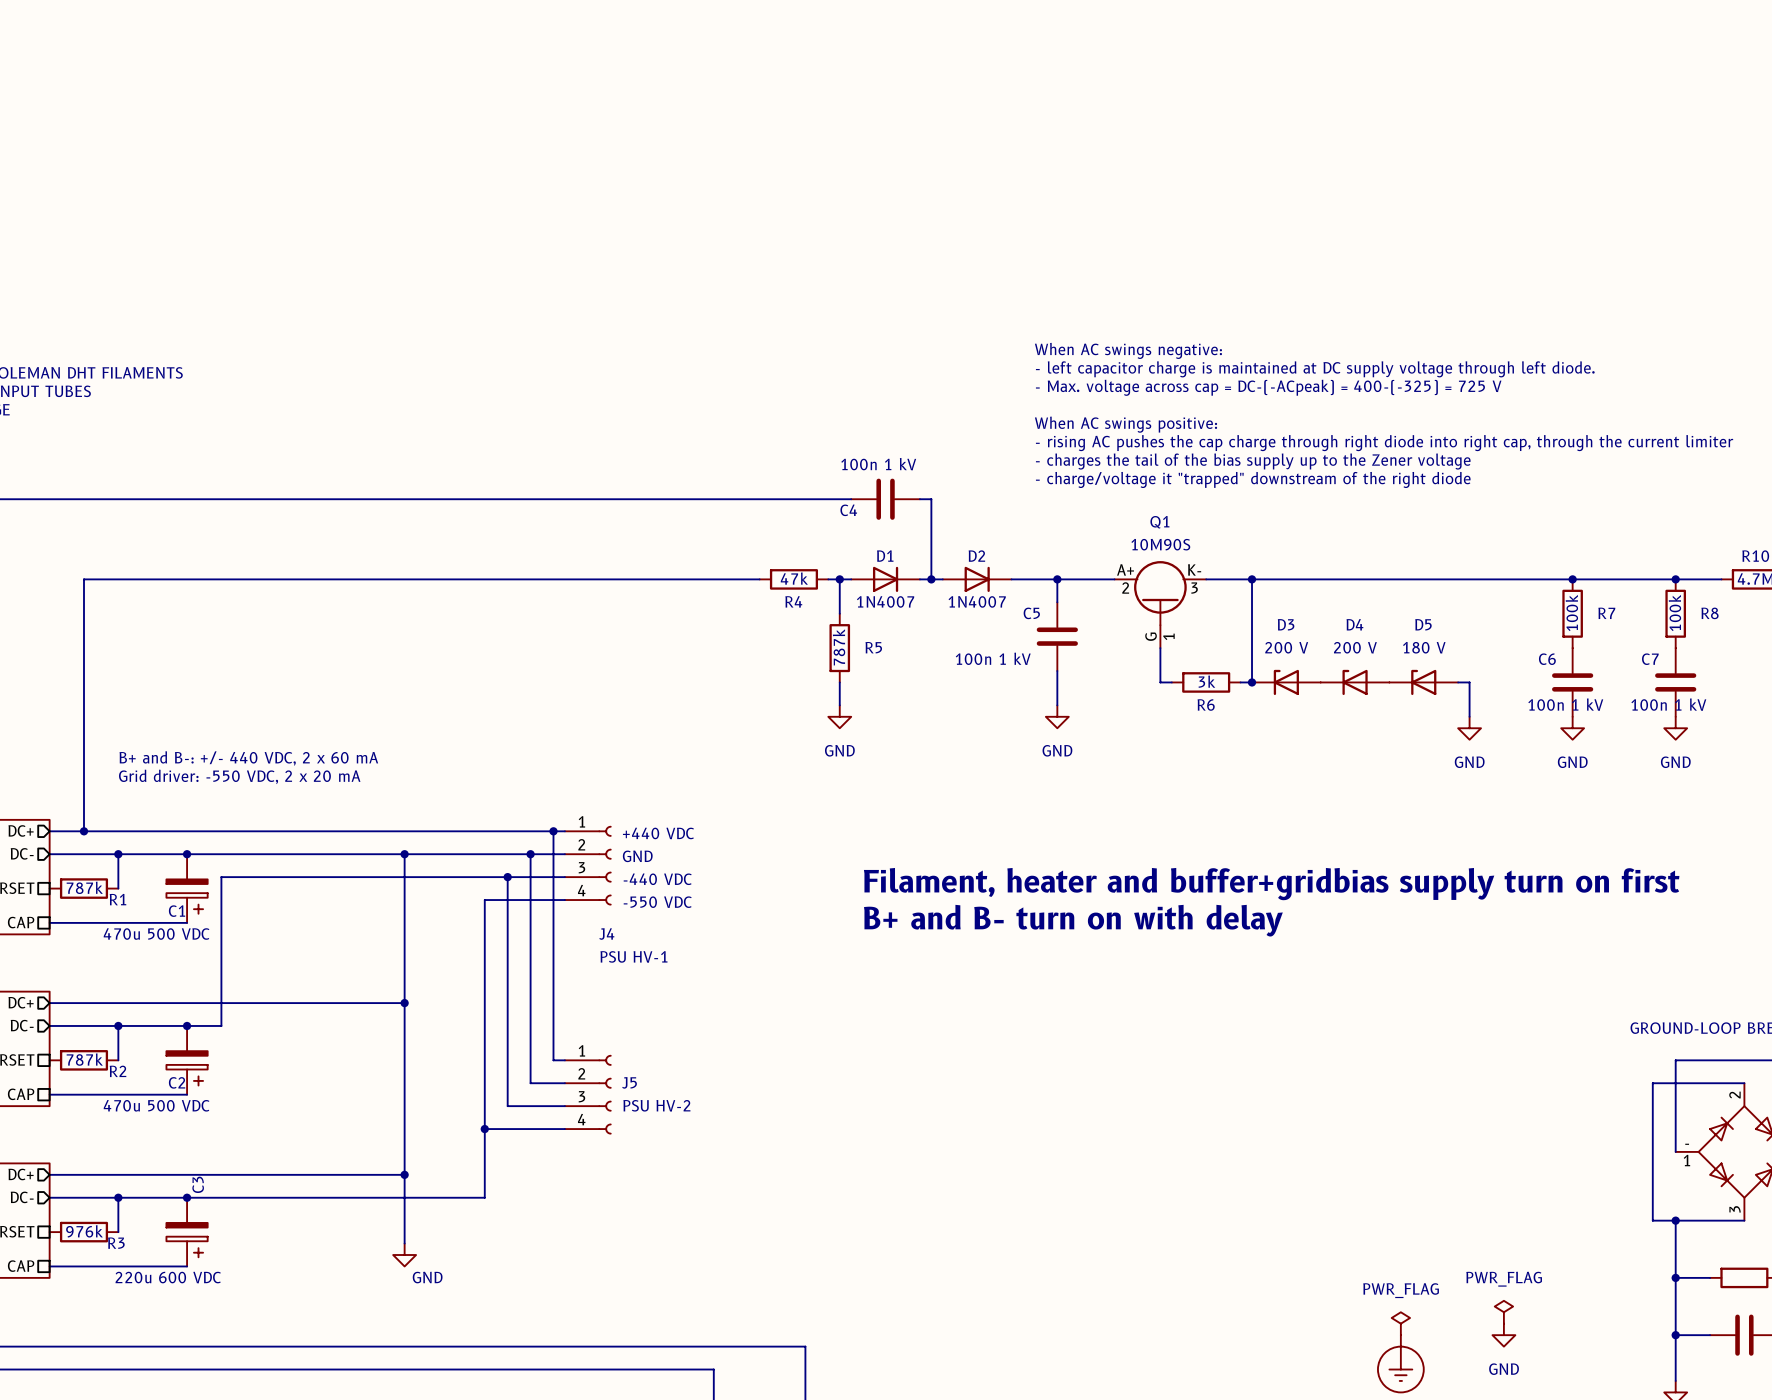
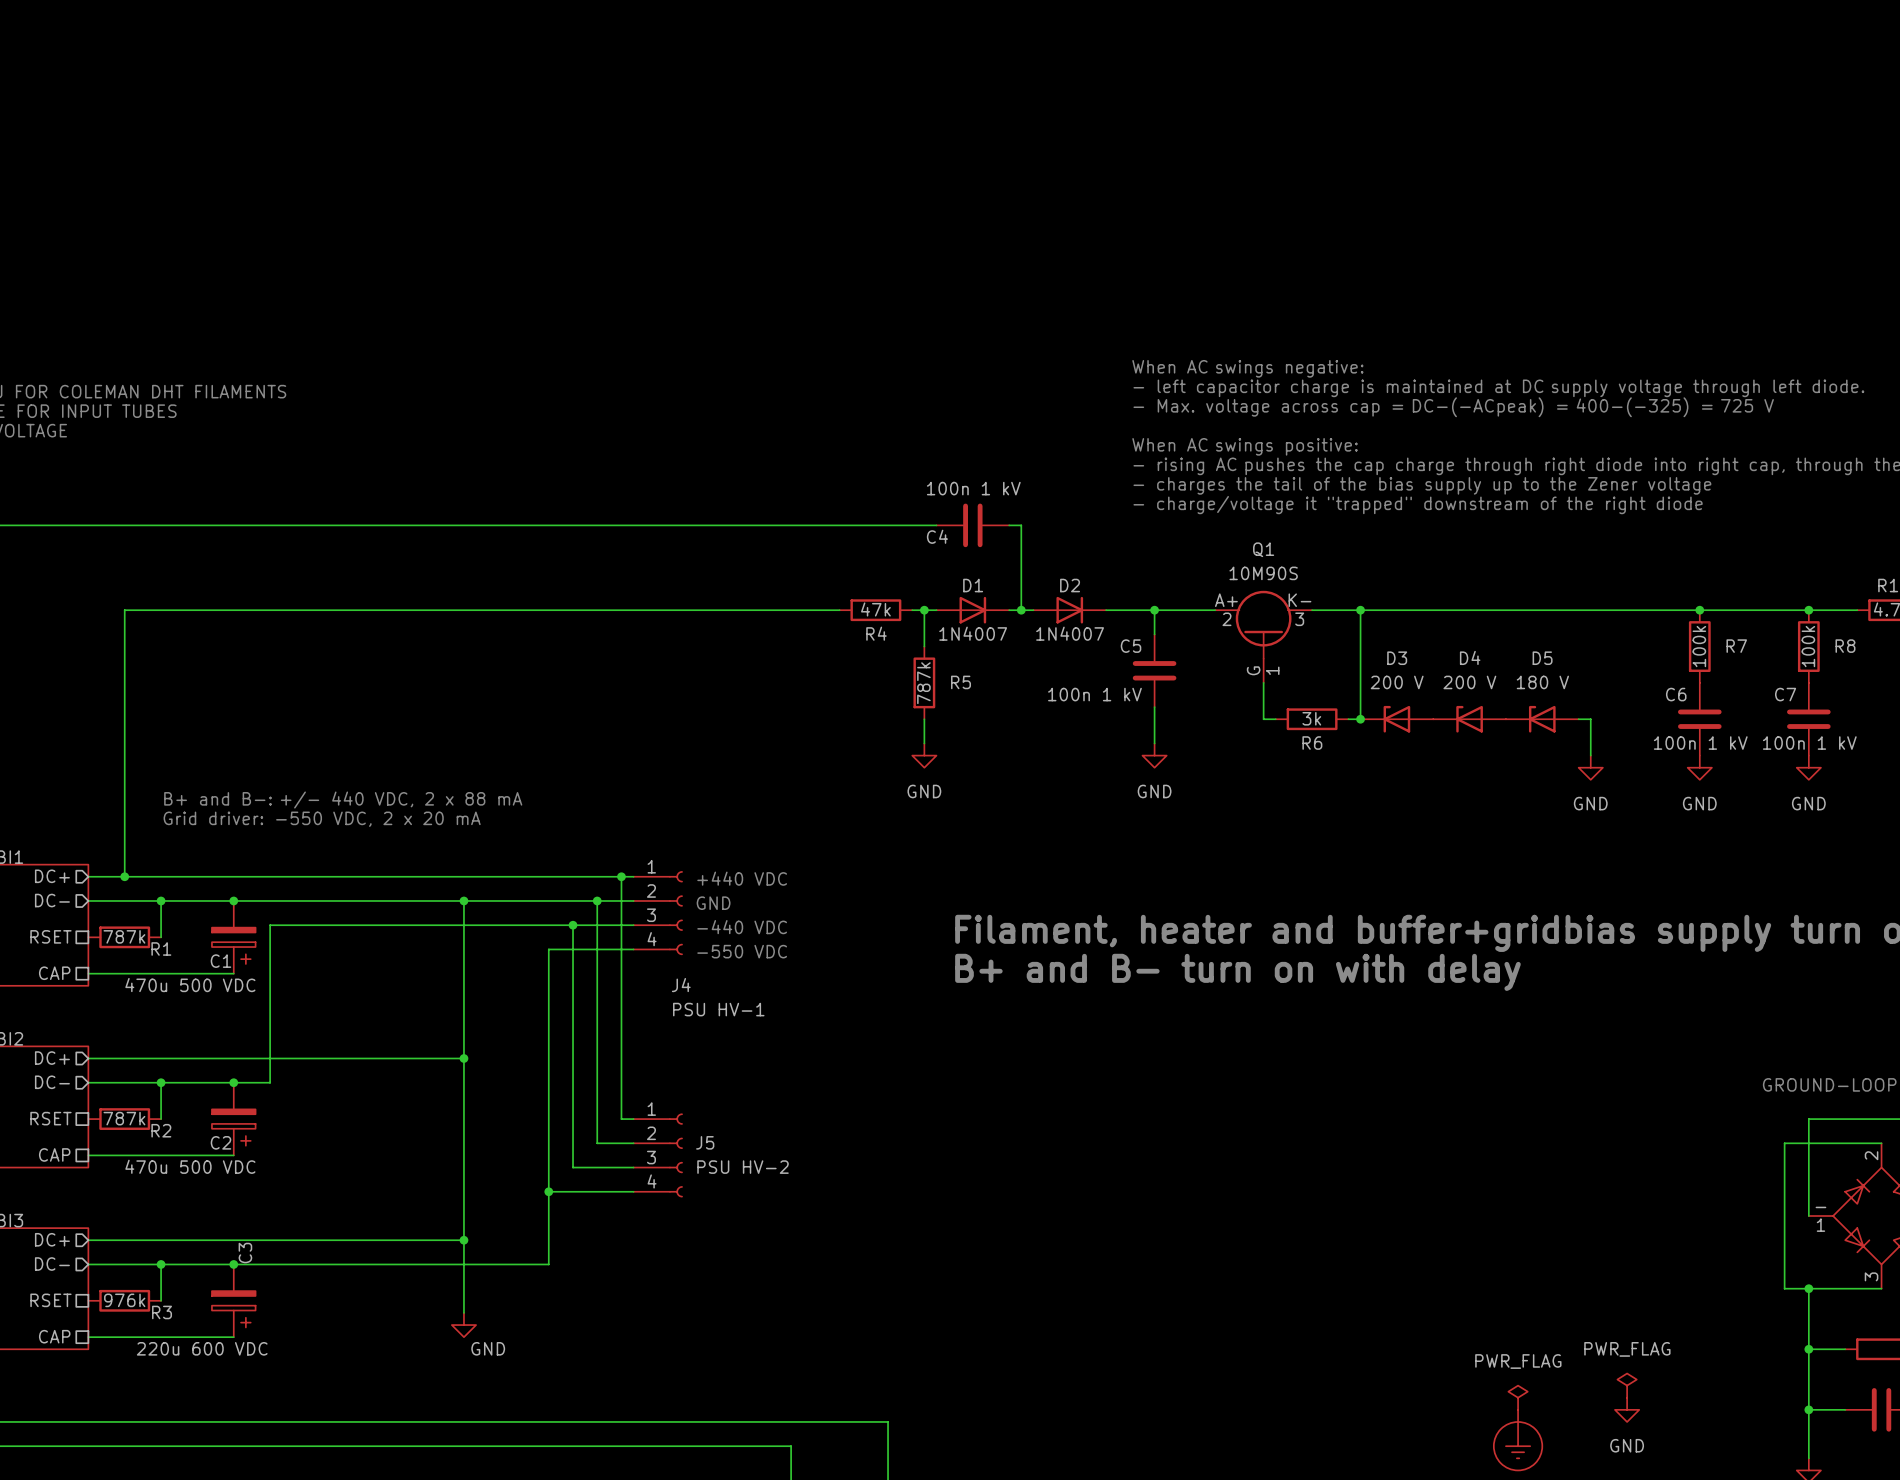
text: B+ and B-: +/- 440 VDC, 2 x 60 mA (248, 758) -> B+ and B-: +/- 440 VDC, 2 x 88 mA (343, 800)

